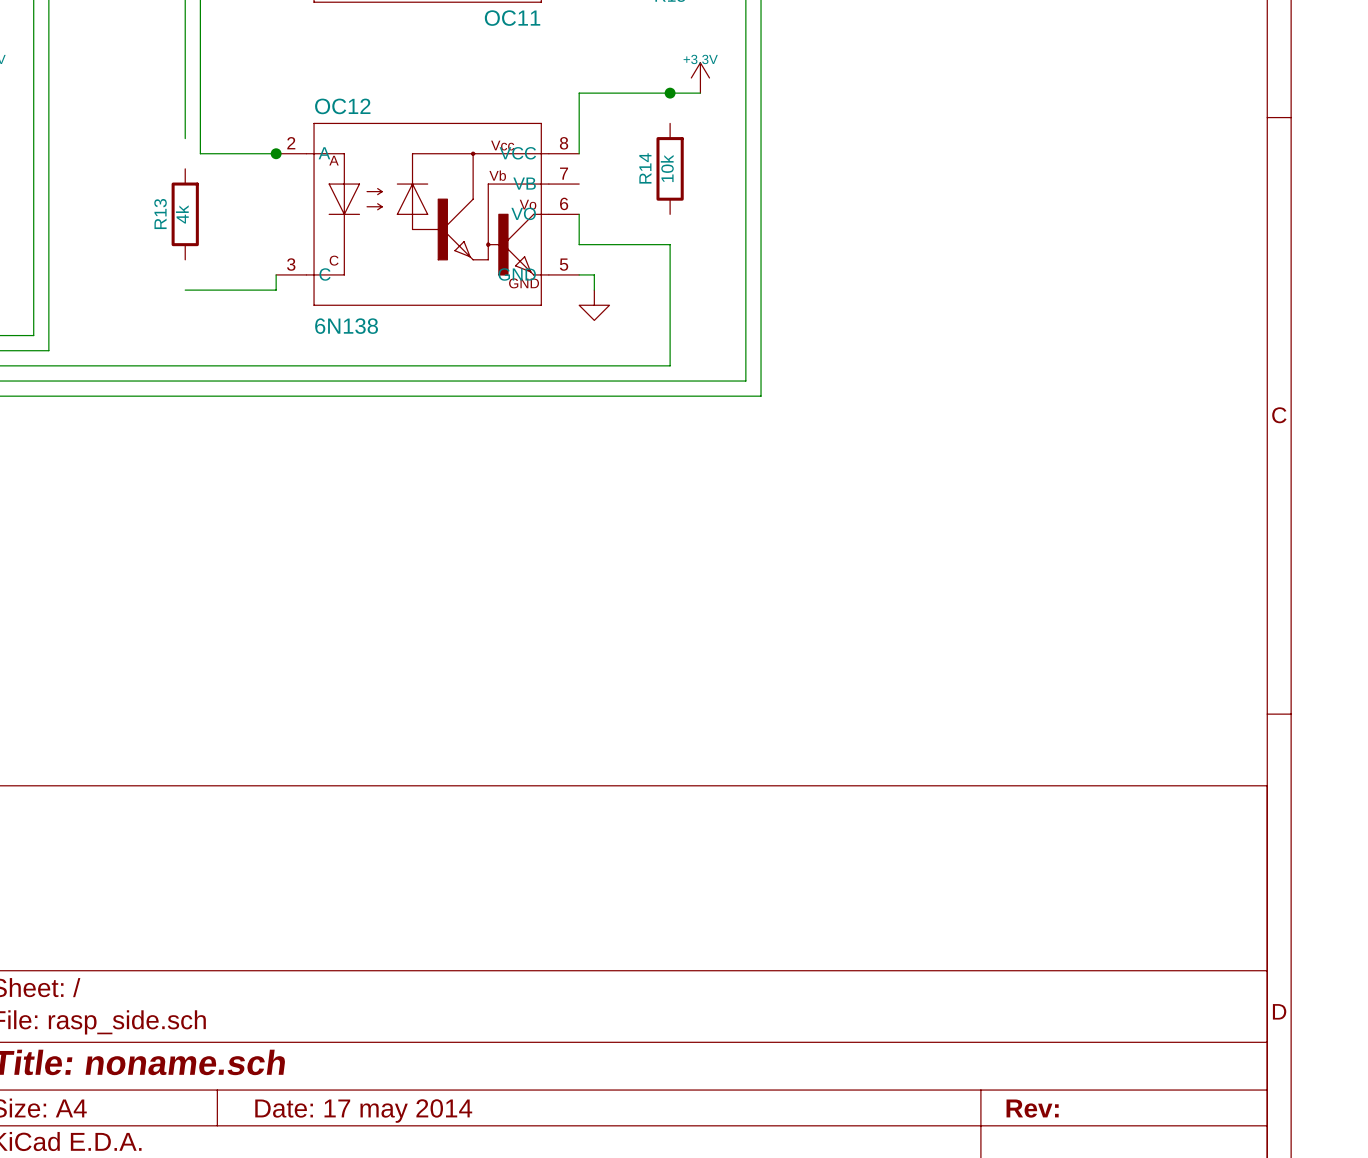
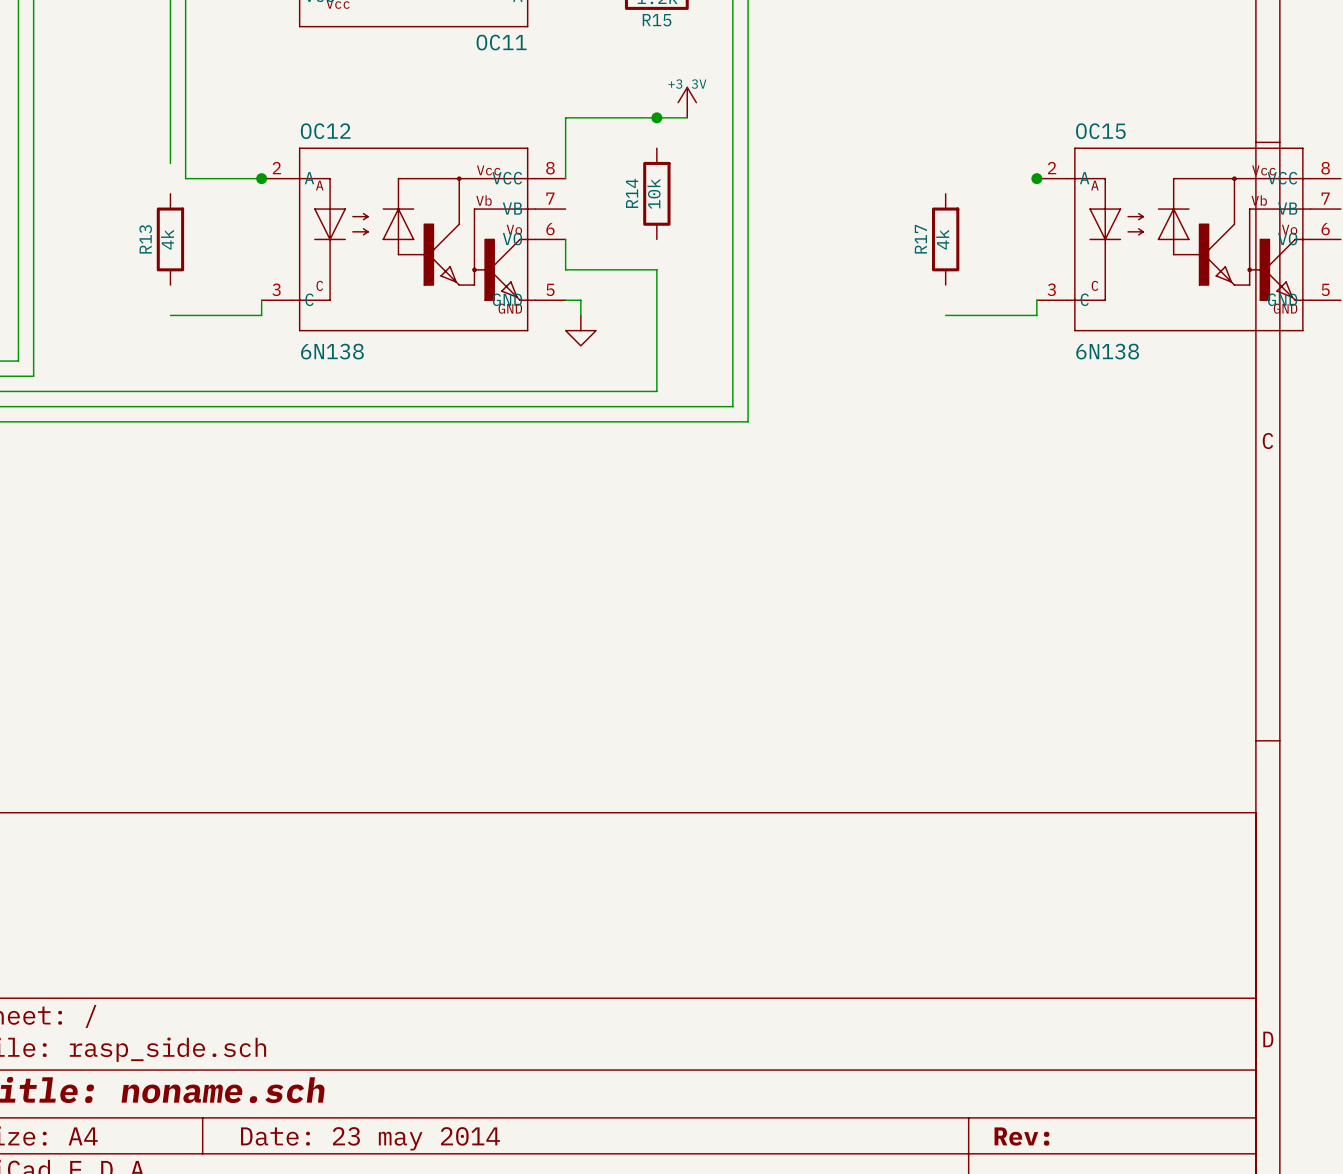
junction: none -> (1036, 178)
R17: none -> 4k (945, 239)
OC15: none -> 6N138 (1188, 239)
wire: none -> (1036, 300) (1036, 315) (945, 315)
title block: Date: 17 may 2014 (363, 1111) -> Date: 23 may 2014 (370, 1138)

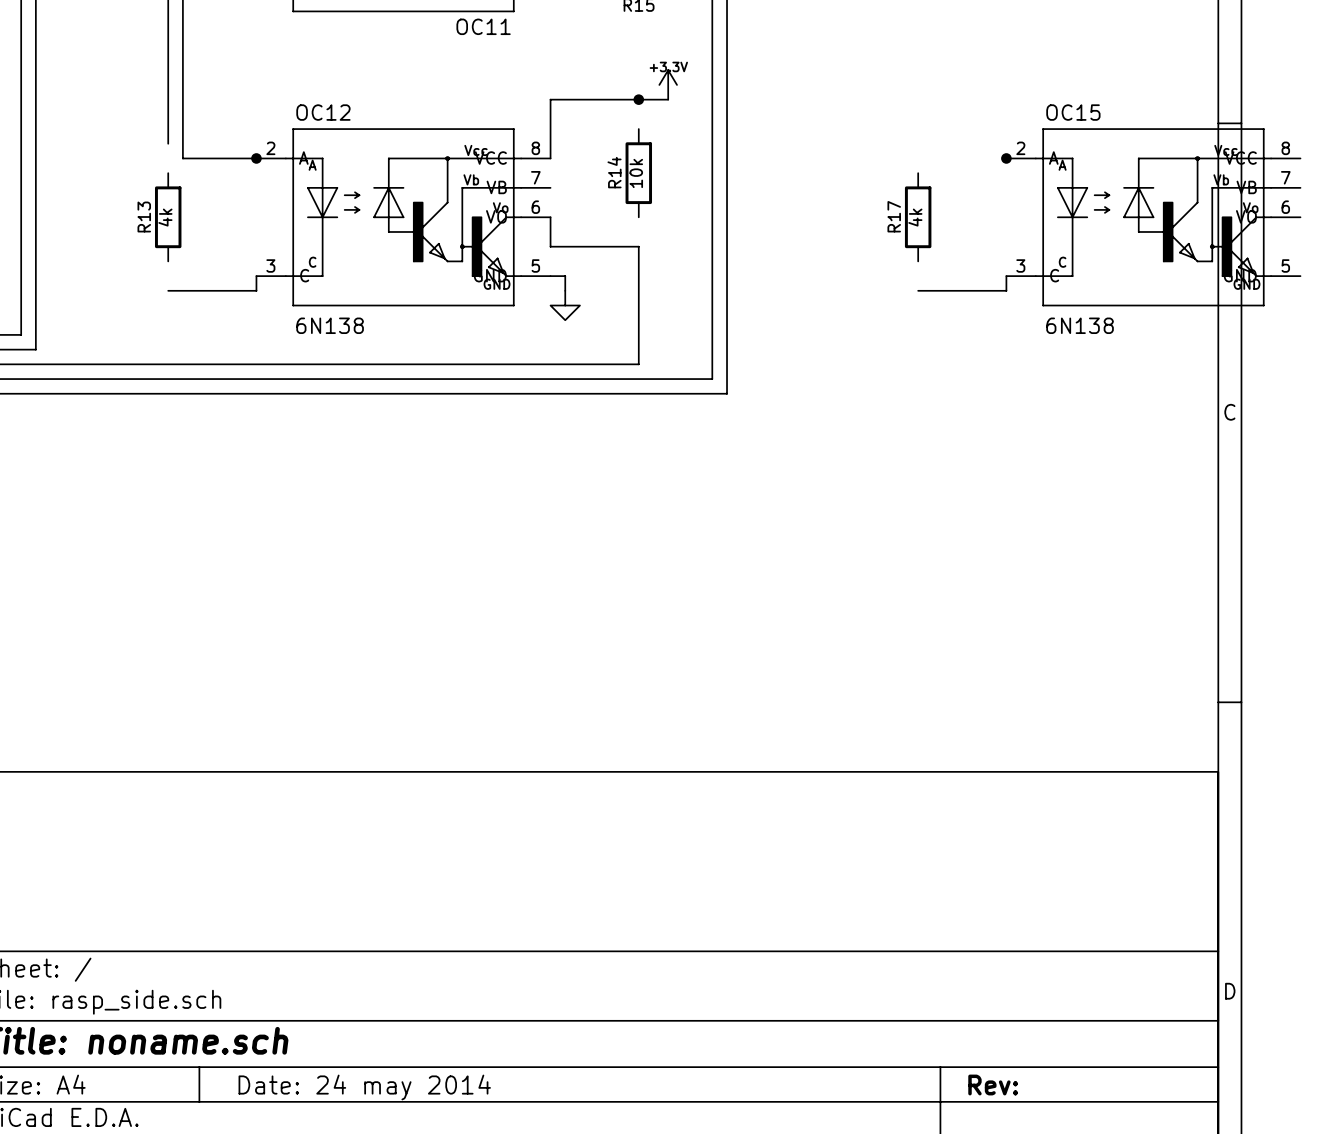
title block: Date: 23 may 2014 (370, 1138) -> Date: 24 may 2014 (364, 1087)

